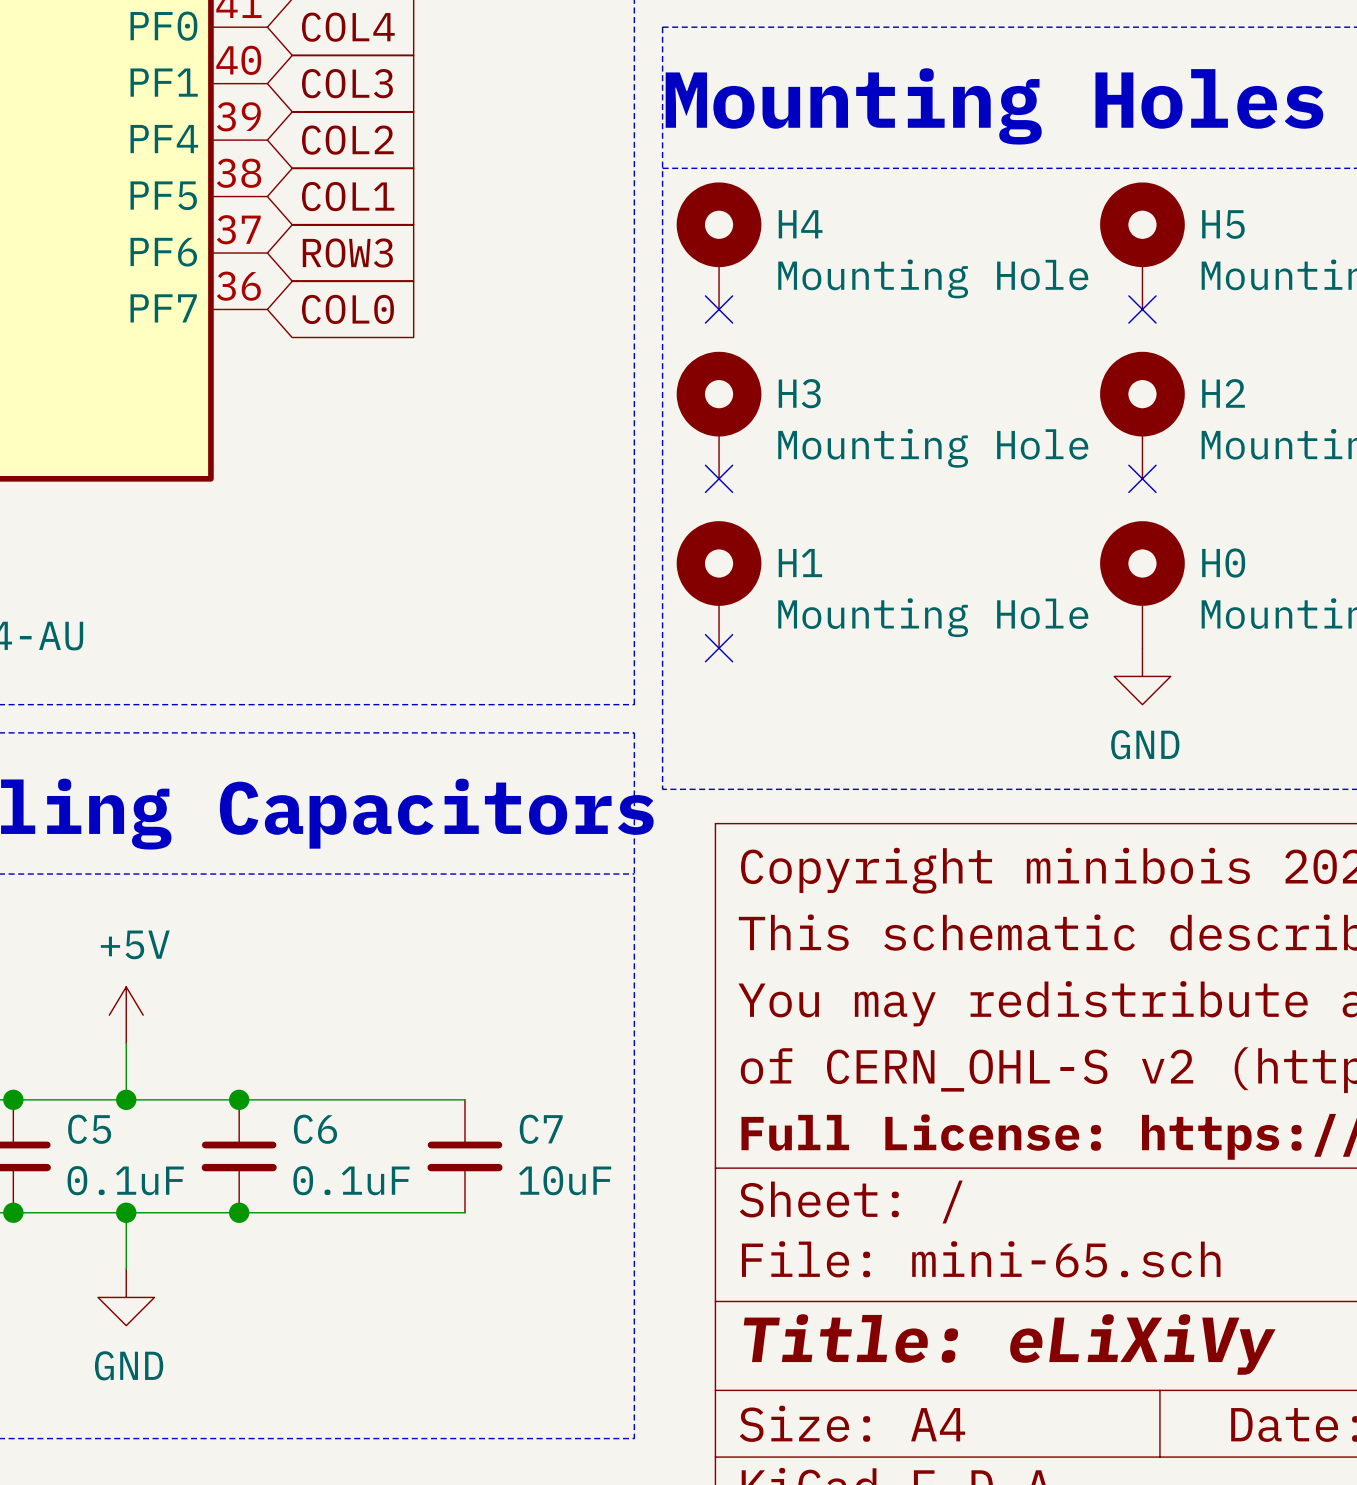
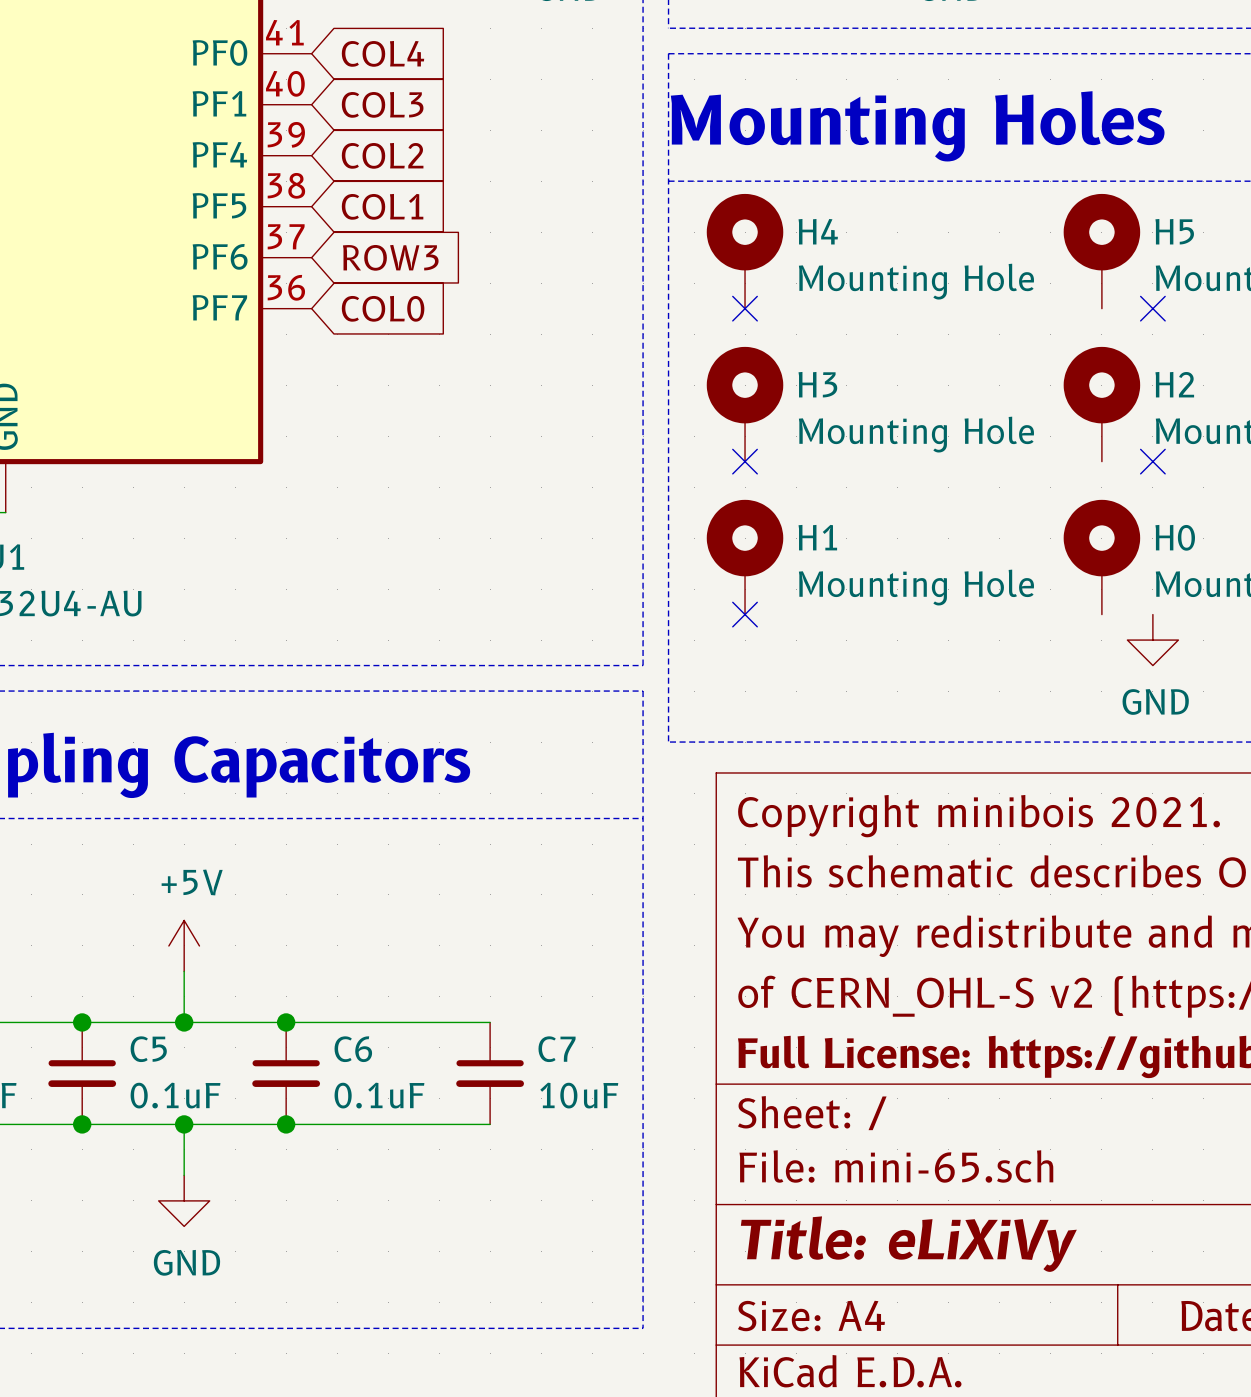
H4 position: (719, 245) -> (745, 251)
no-connect mark position: (719, 309) -> (745, 308)
no-connect mark position: (1142, 309) -> (1152, 308)
H3 position: (719, 415) -> (745, 404)
no-connect mark position: (719, 478) -> (745, 461)
no-connect mark position: (1142, 478) -> (1152, 461)
H1 position: (719, 584) -> (745, 557)
no-connect mark position: (719, 648) -> (745, 614)
power symbol position: GND (1142, 676) -> GND (1152, 640)

